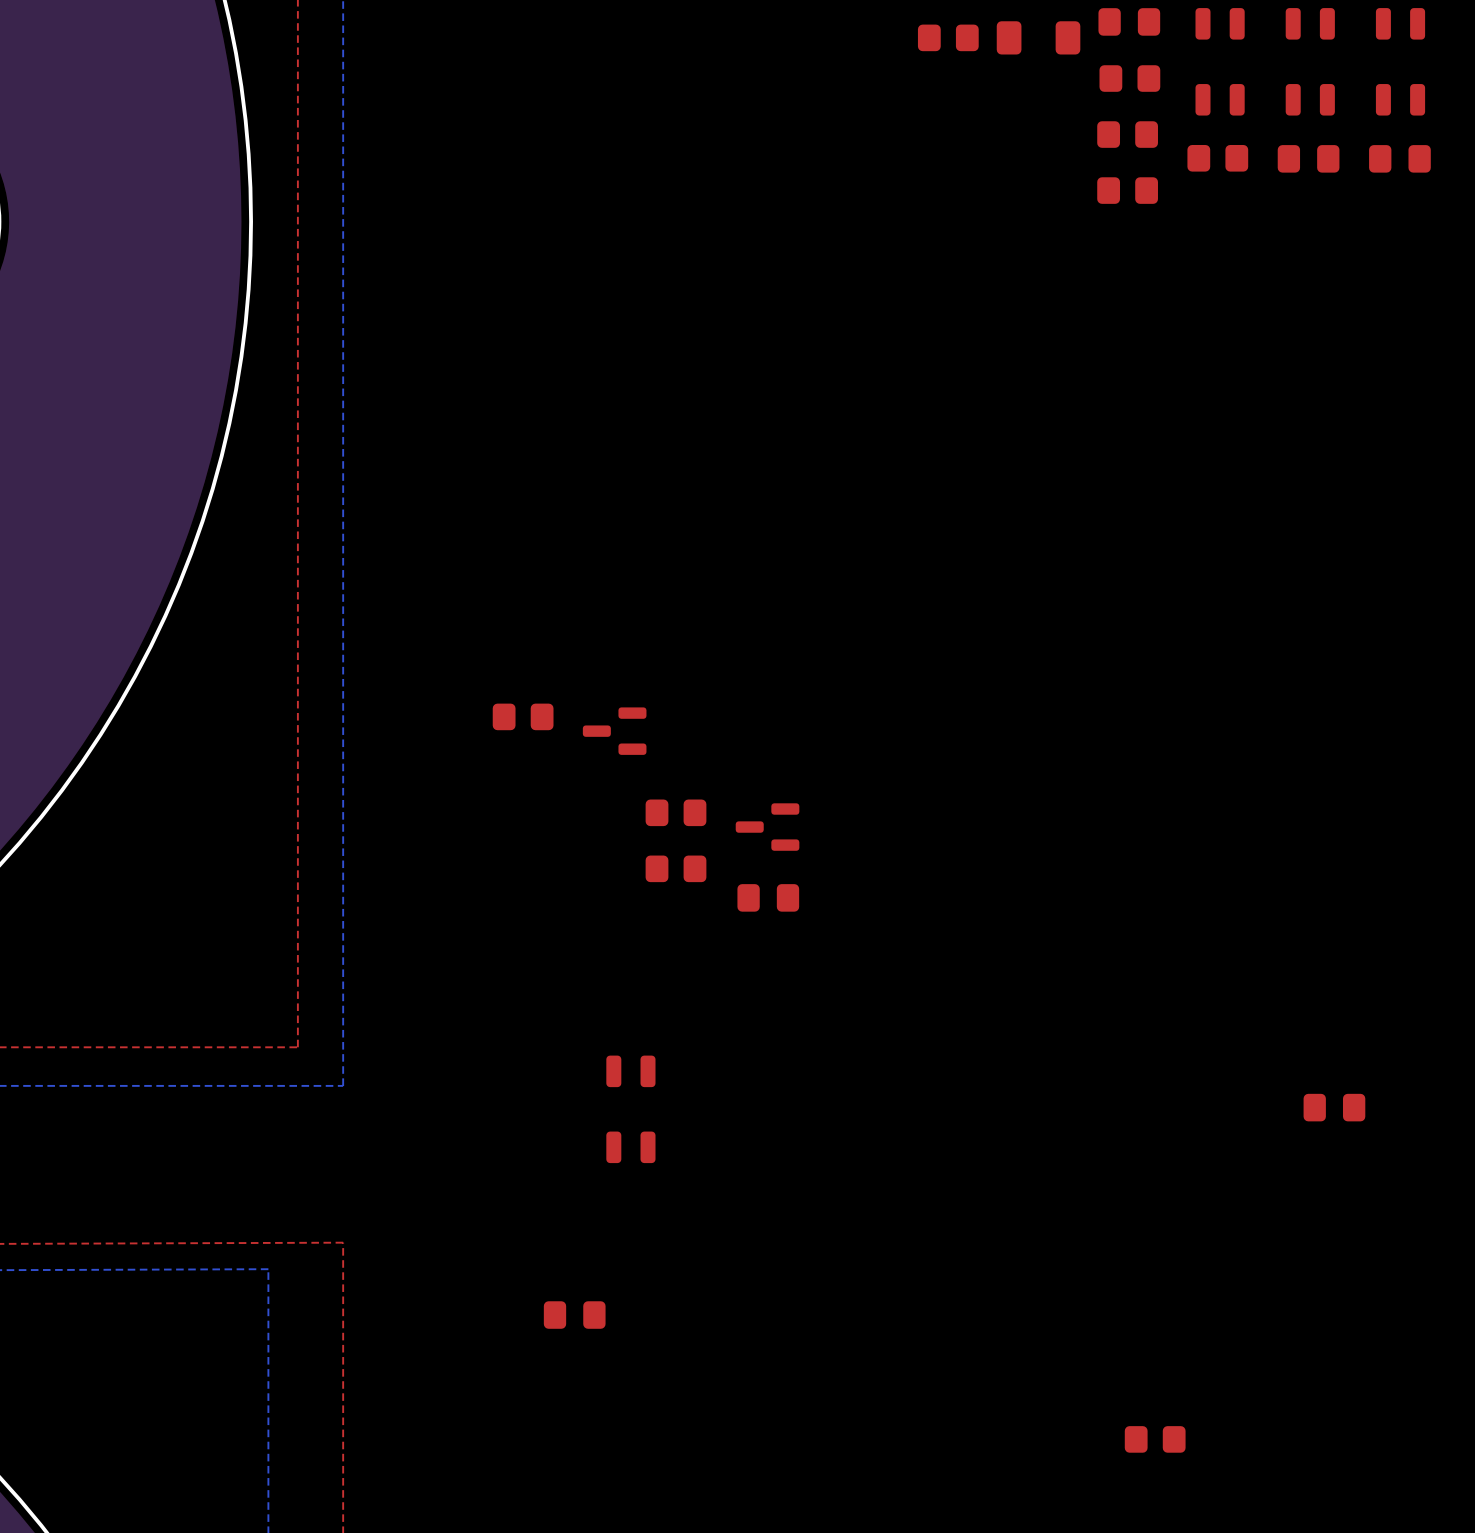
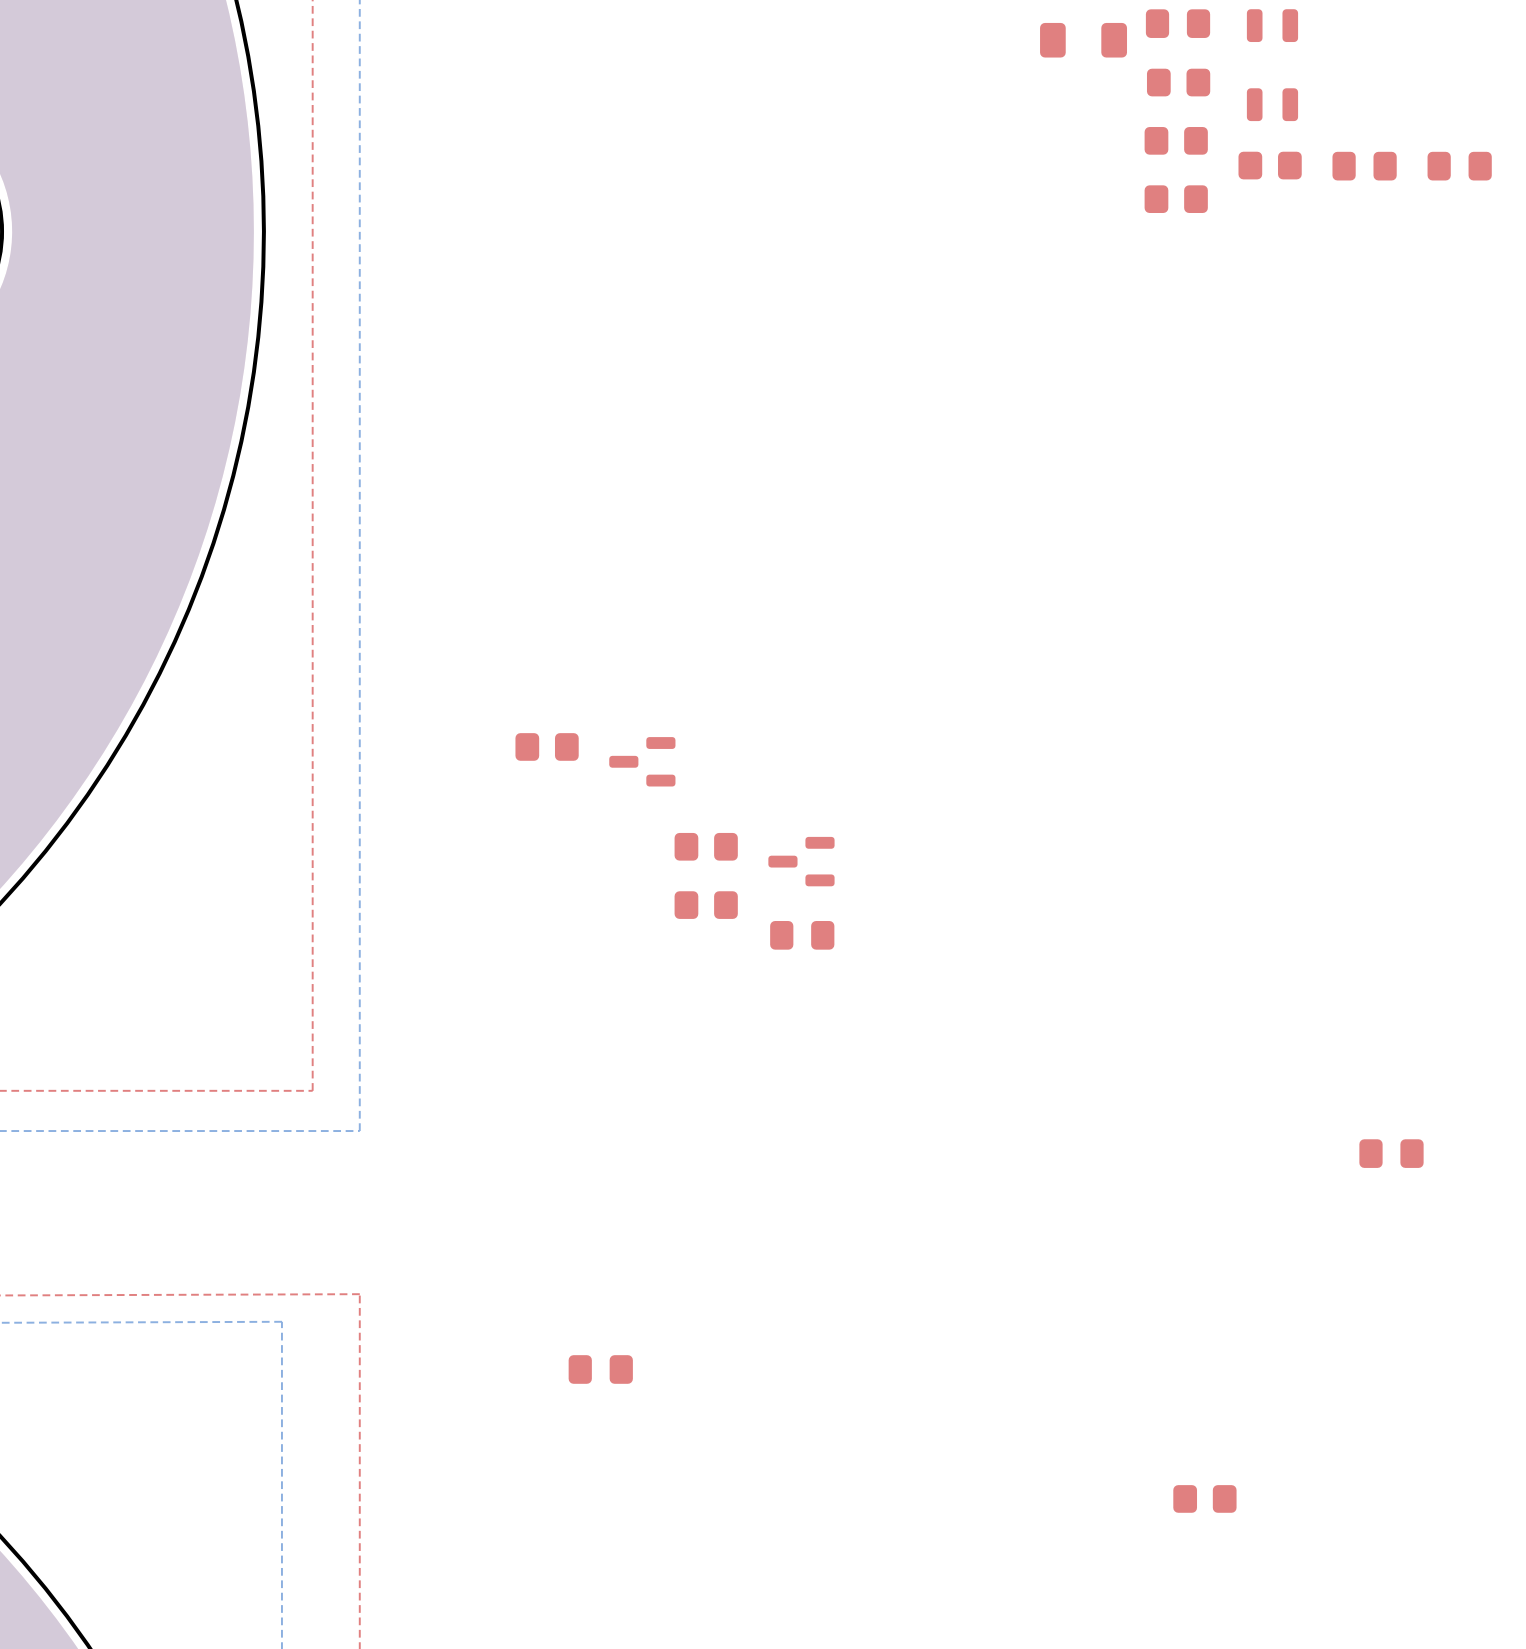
part: (948, 37) -> none
part: (1310, 61) -> none
part: (1400, 61) -> none
part: (630, 1109) -> none

